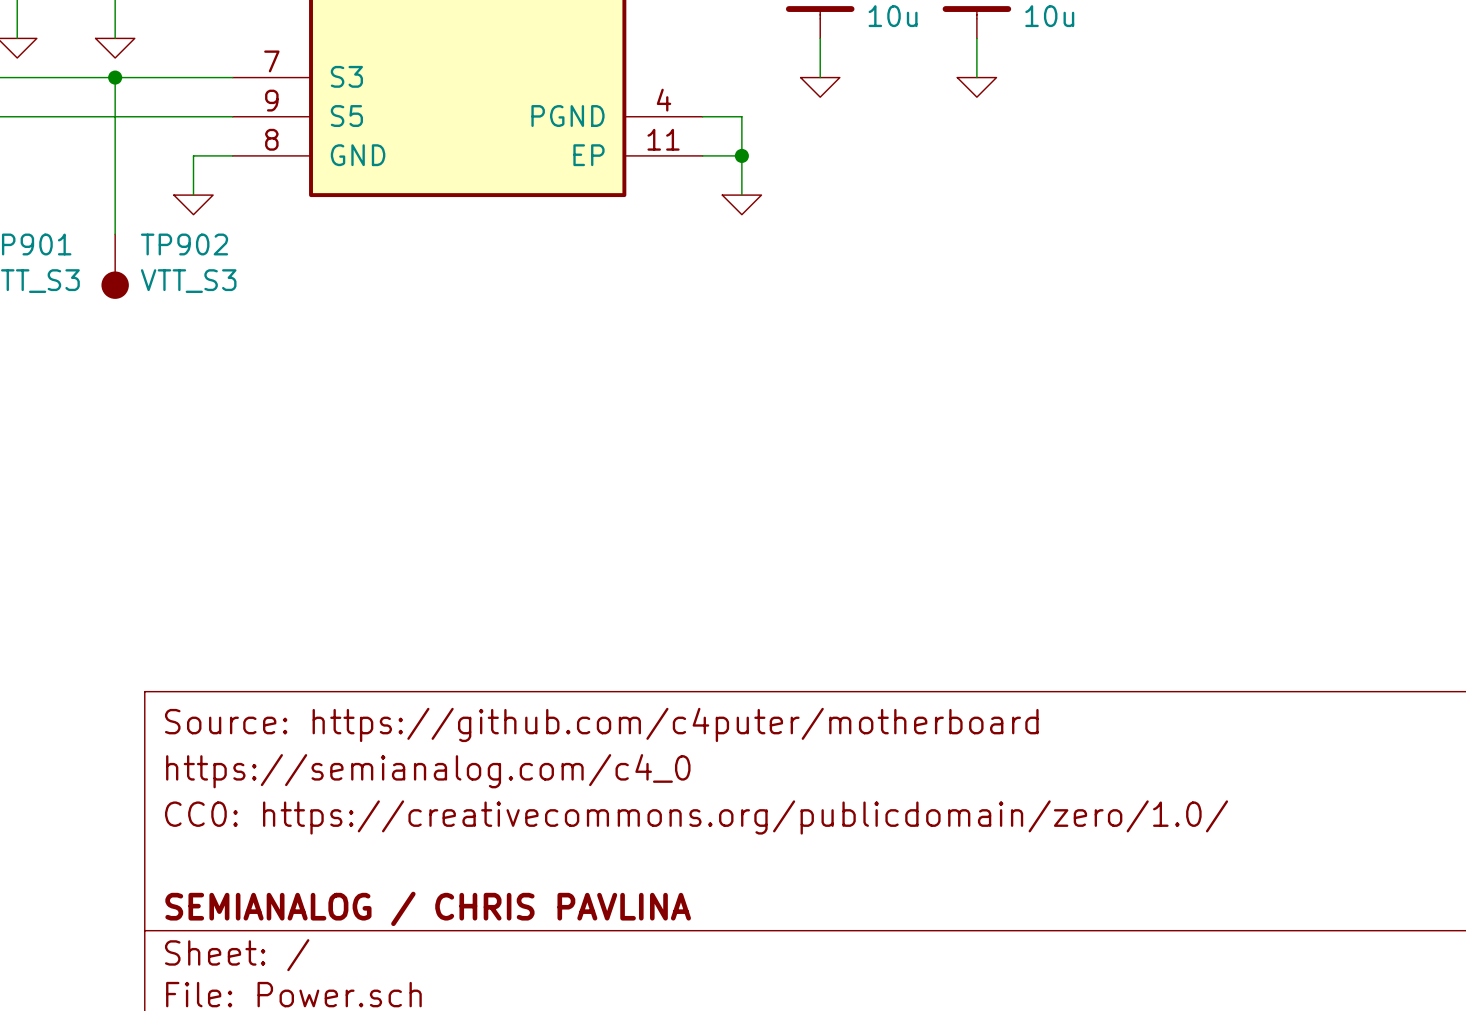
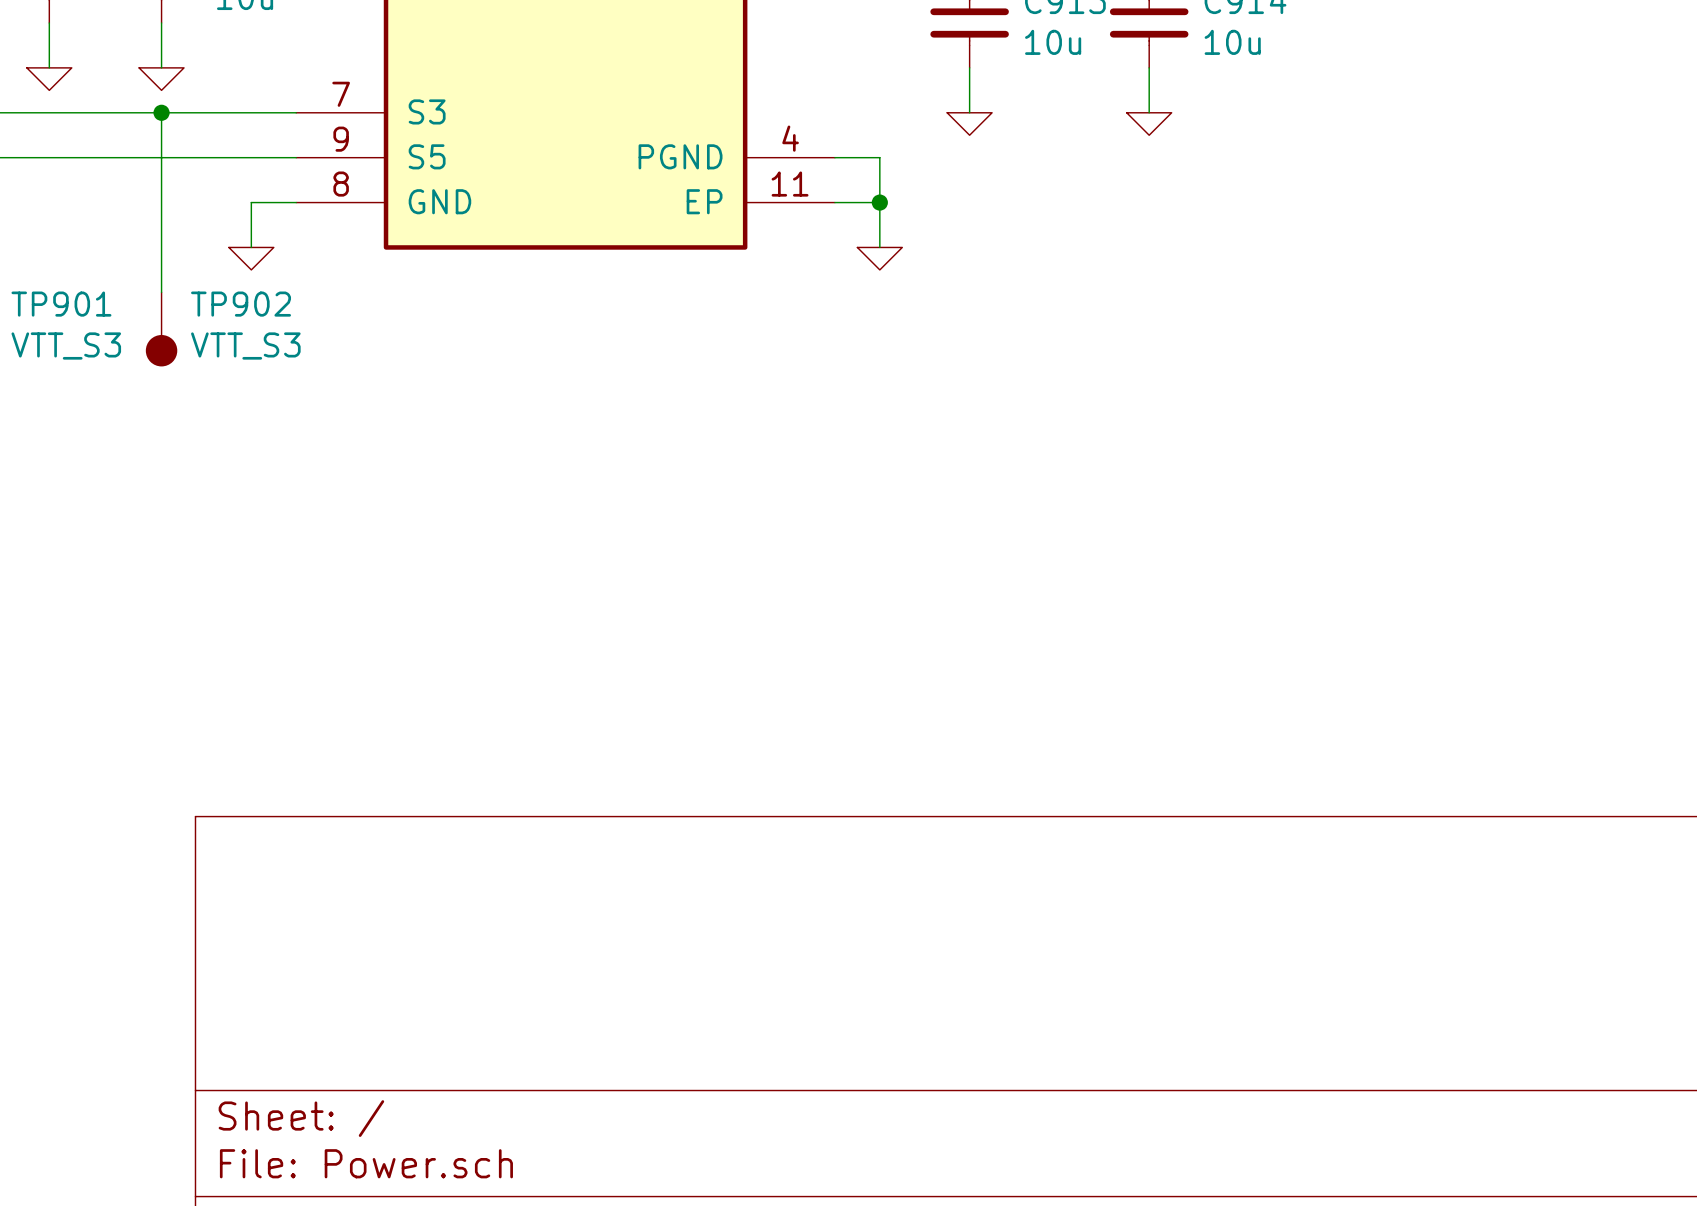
title block: Source: https://github.com/c4puter/motherboard (601, 724) -> none
title block: https://semianalog.com/c4_0 (428, 771) -> none
title block: CC0: https://creativecommons.org/publicdomain/zero/1.0/ (696, 817) -> none
title block: SEMIANALOG / CHRIS PAVLINA (428, 908) -> none

